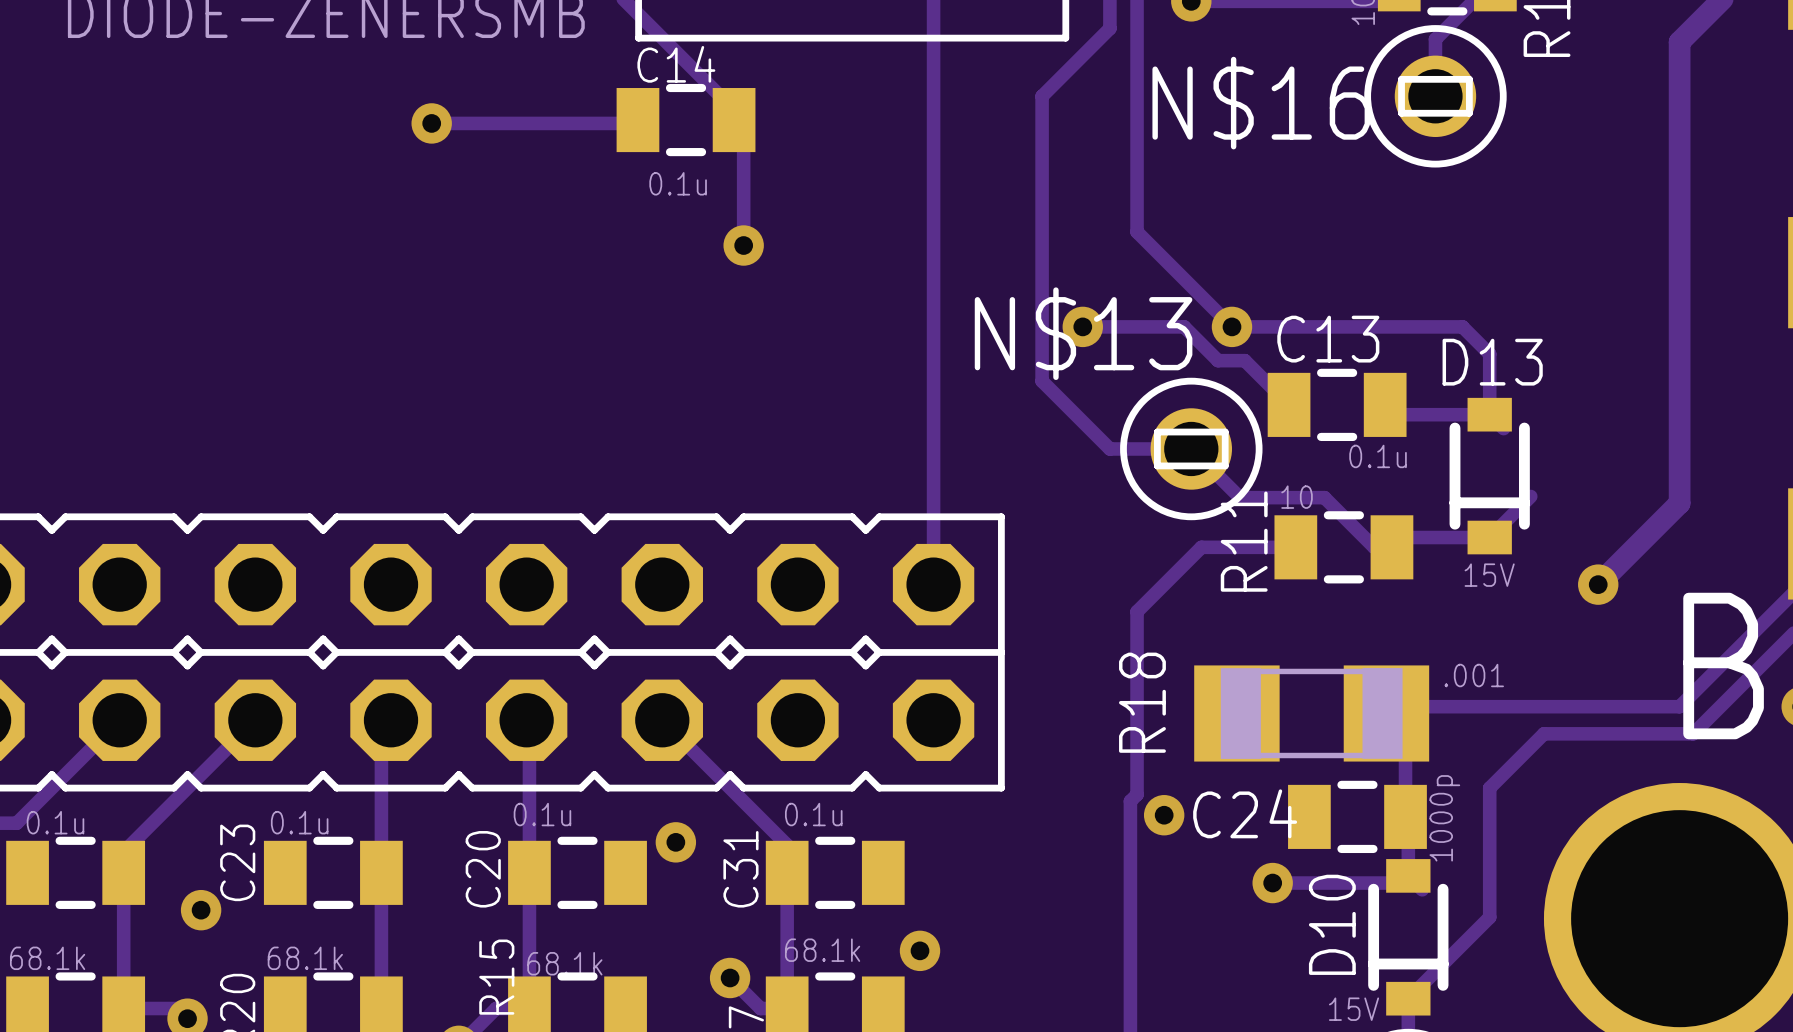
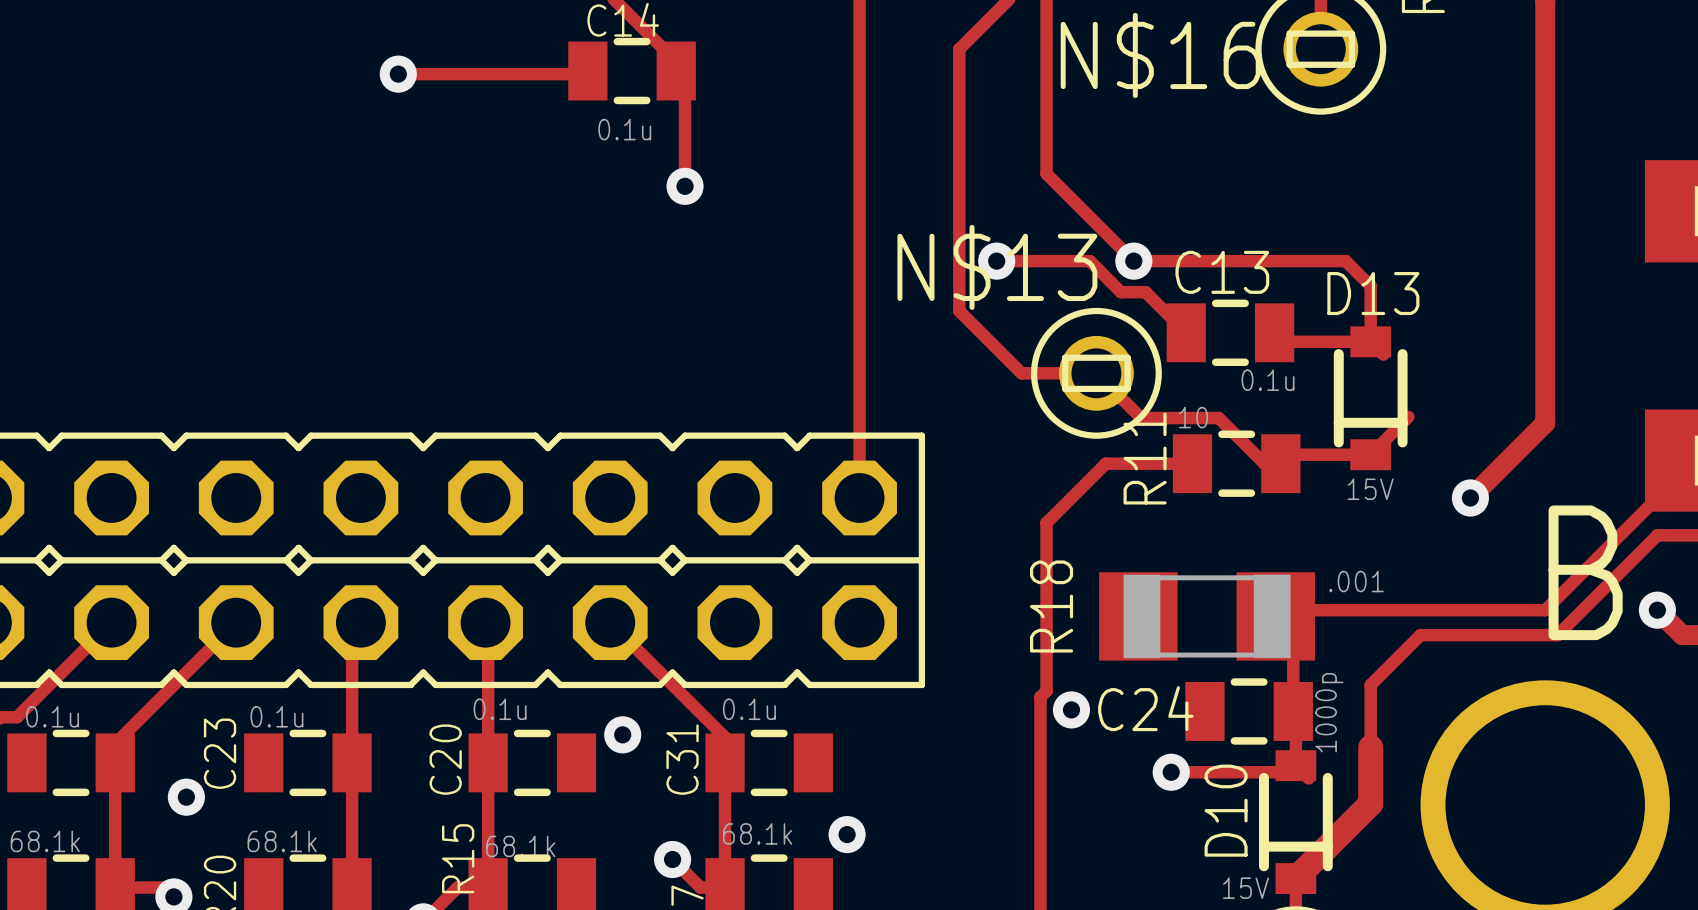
track width: thin (1489, 855) (1489, 917) (1408, 998) -> thick (1370, 747) (1370, 803) (1295, 878)

